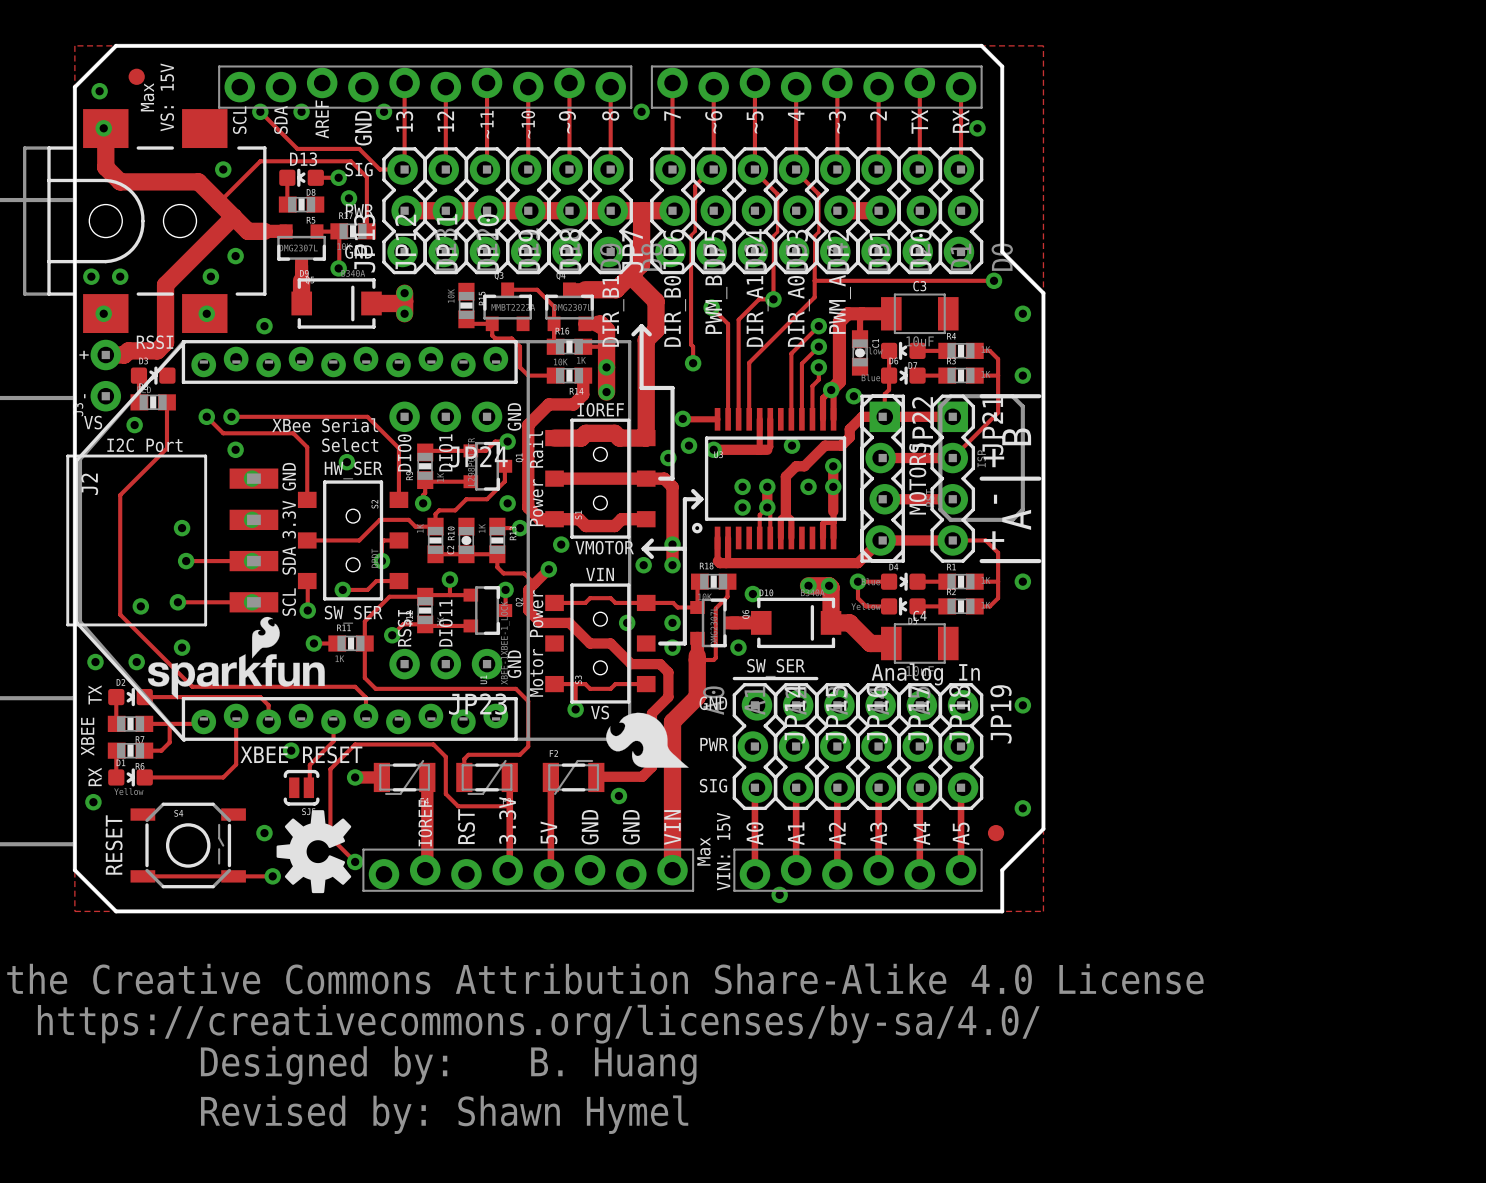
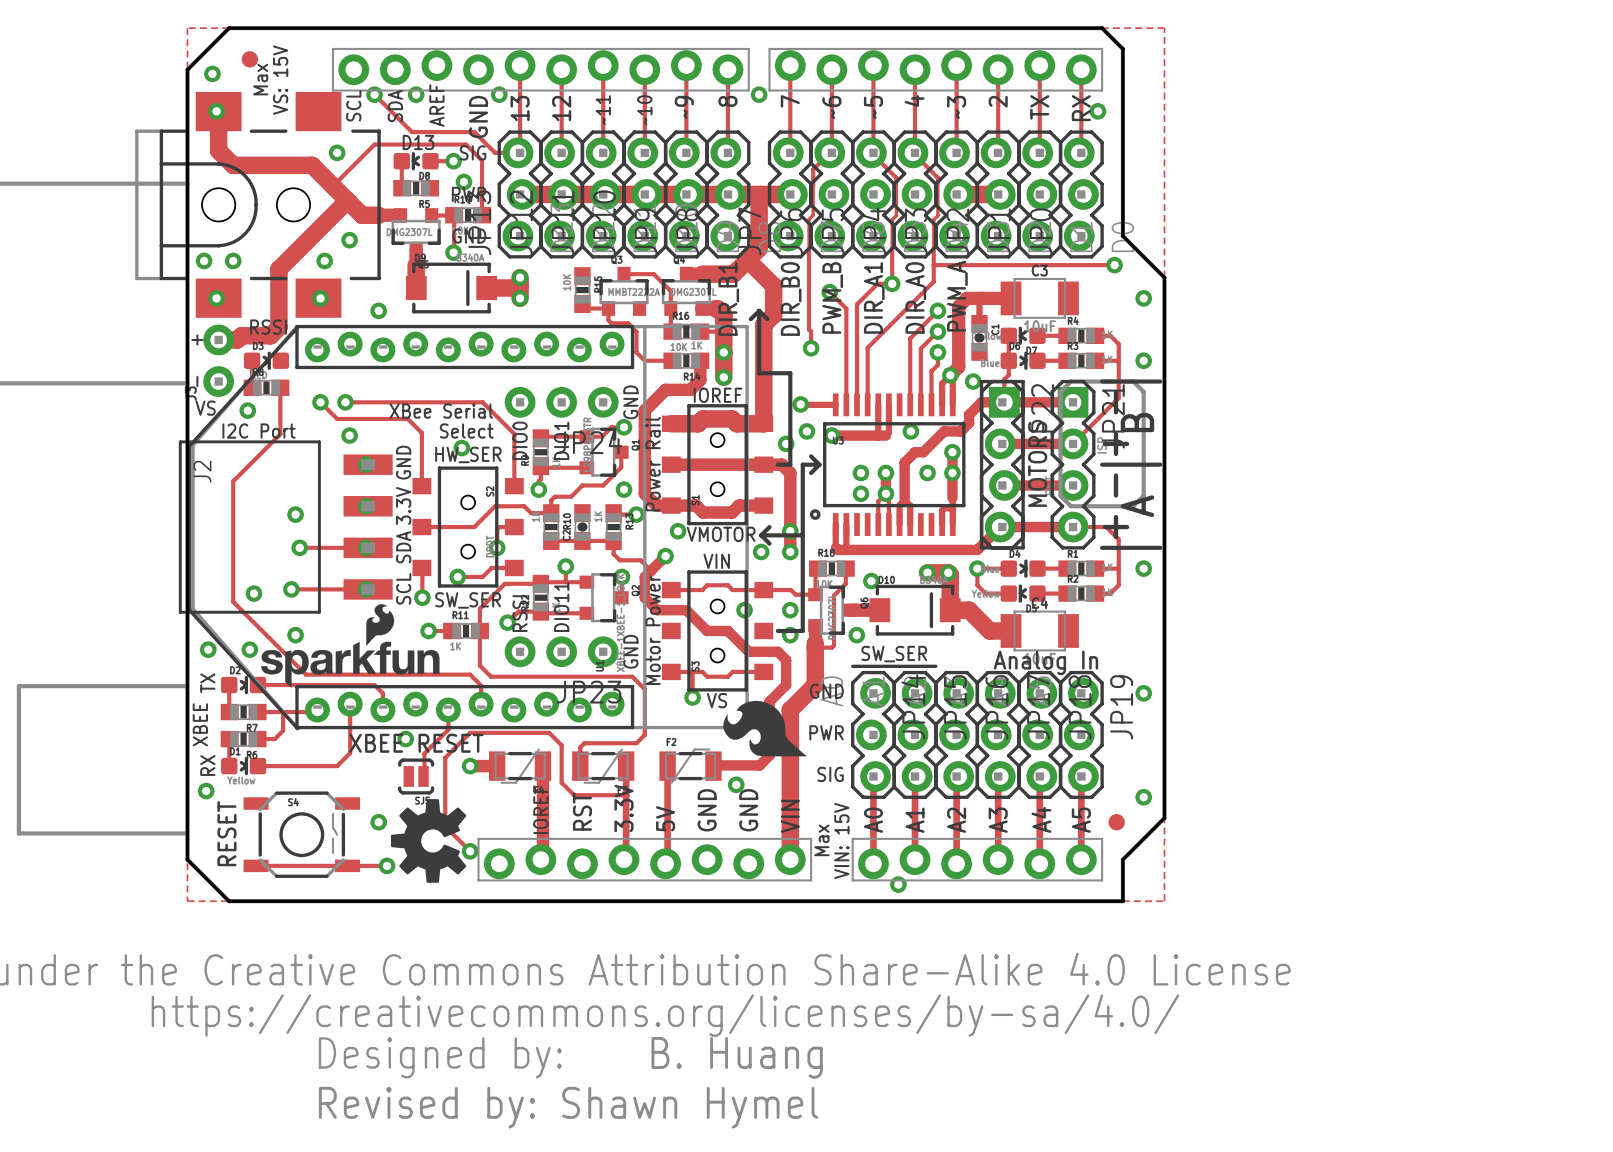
line: (693, 491) (701, 499) -> (811, 456) (819, 464)
line: (684, 499) (701, 499) -> (802, 485) (802, 464) (819, 464)
line: (701, 499) (693, 507) -> (819, 464) (811, 473)

